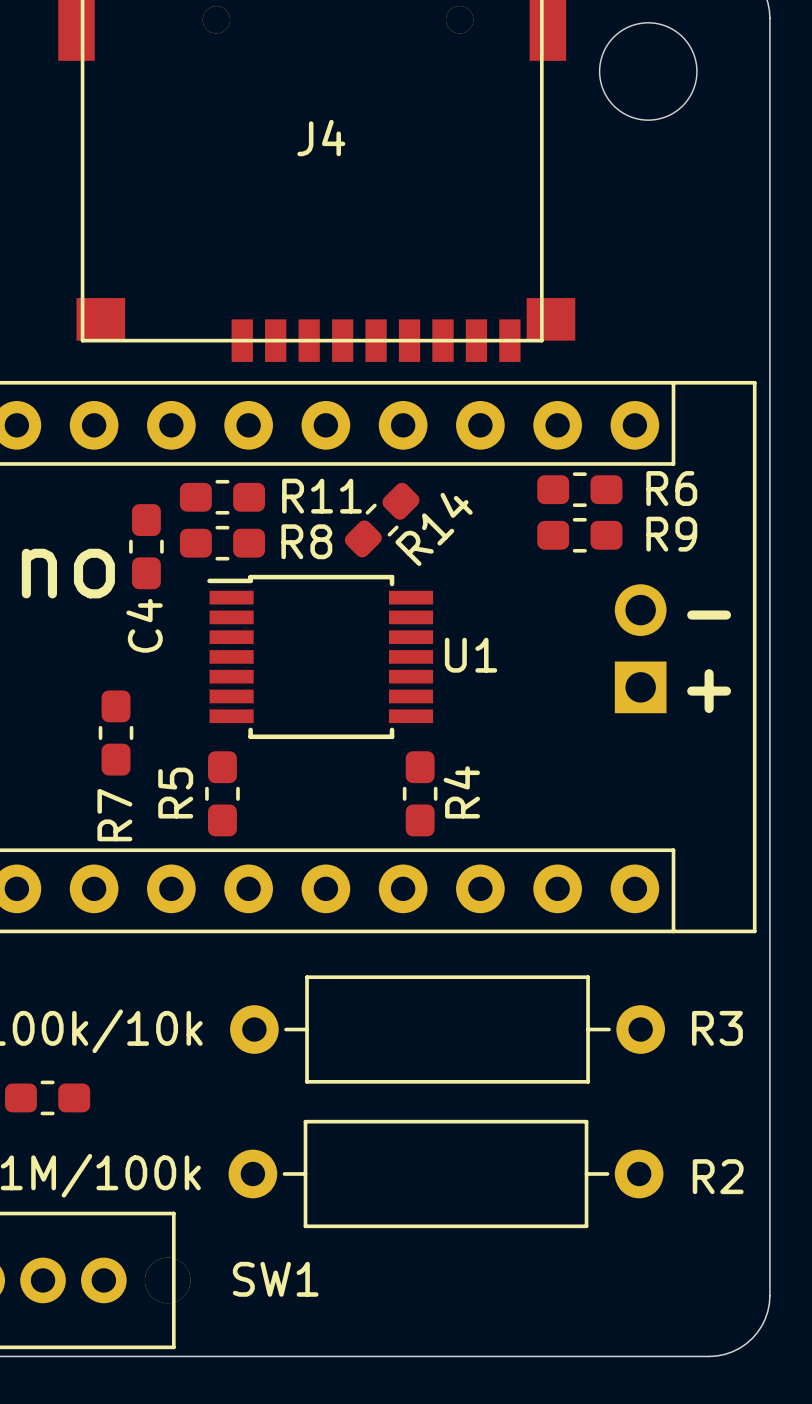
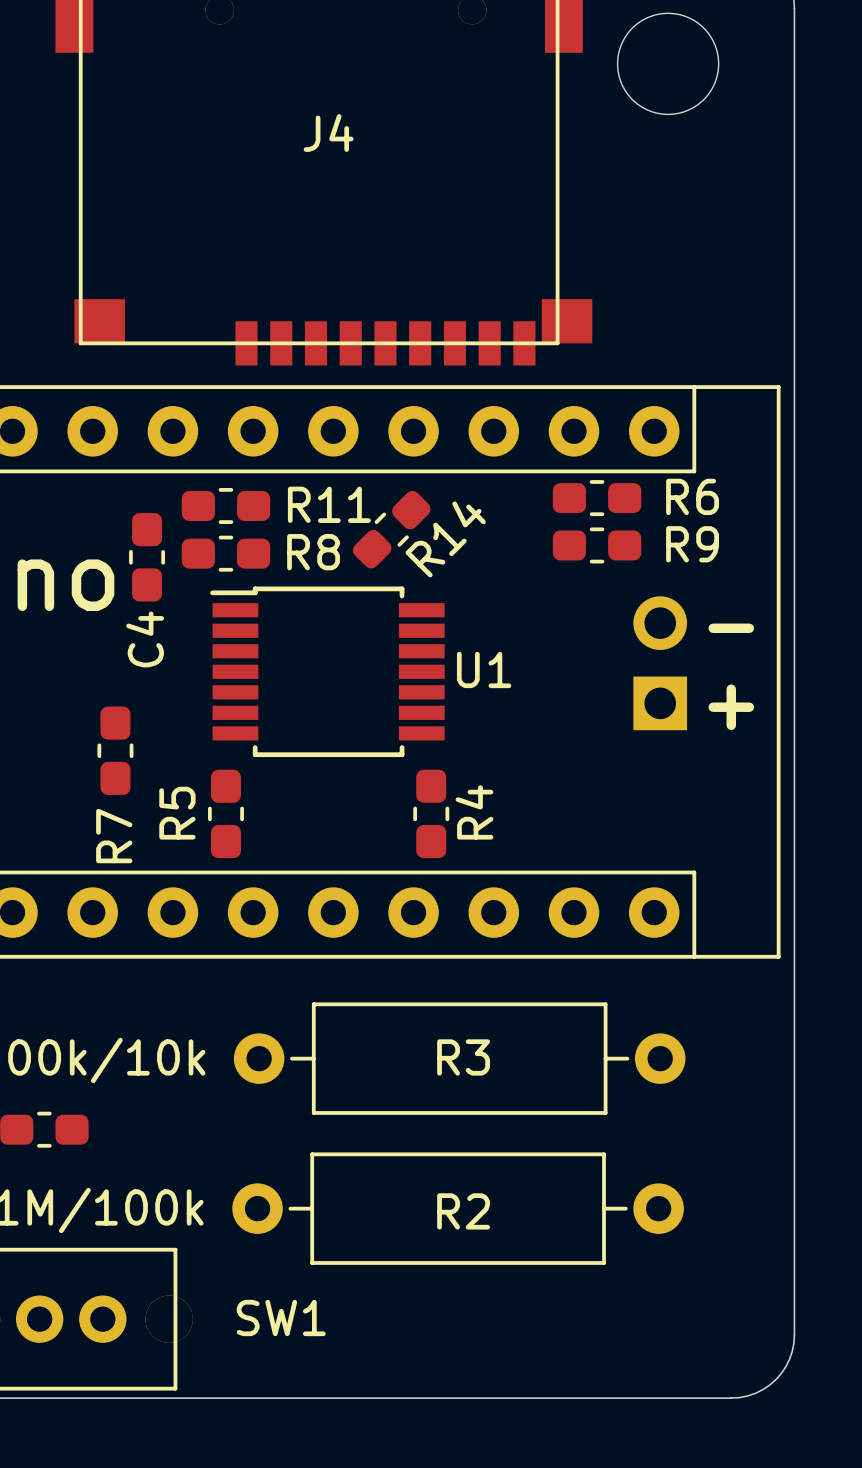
R3 name position: R3 (717, 1028) -> R3 (463, 1057)
R2 name position: R2 (718, 1176) -> R2 (463, 1211)

